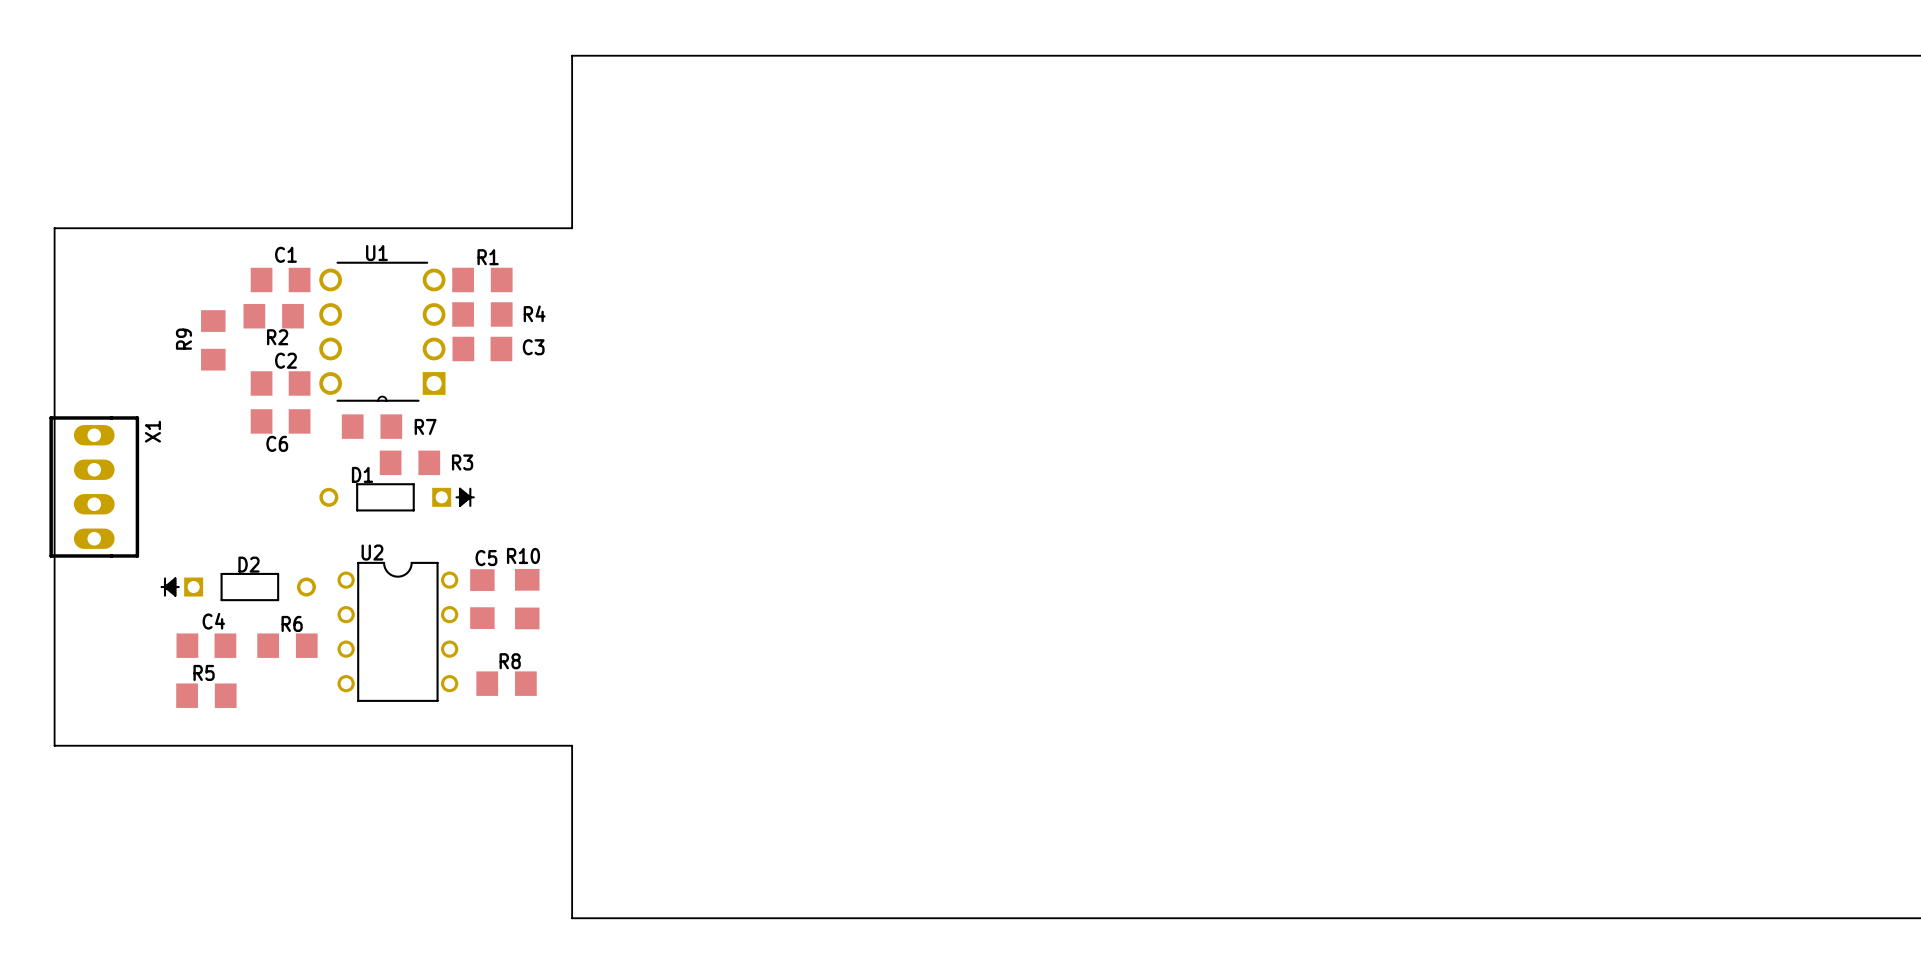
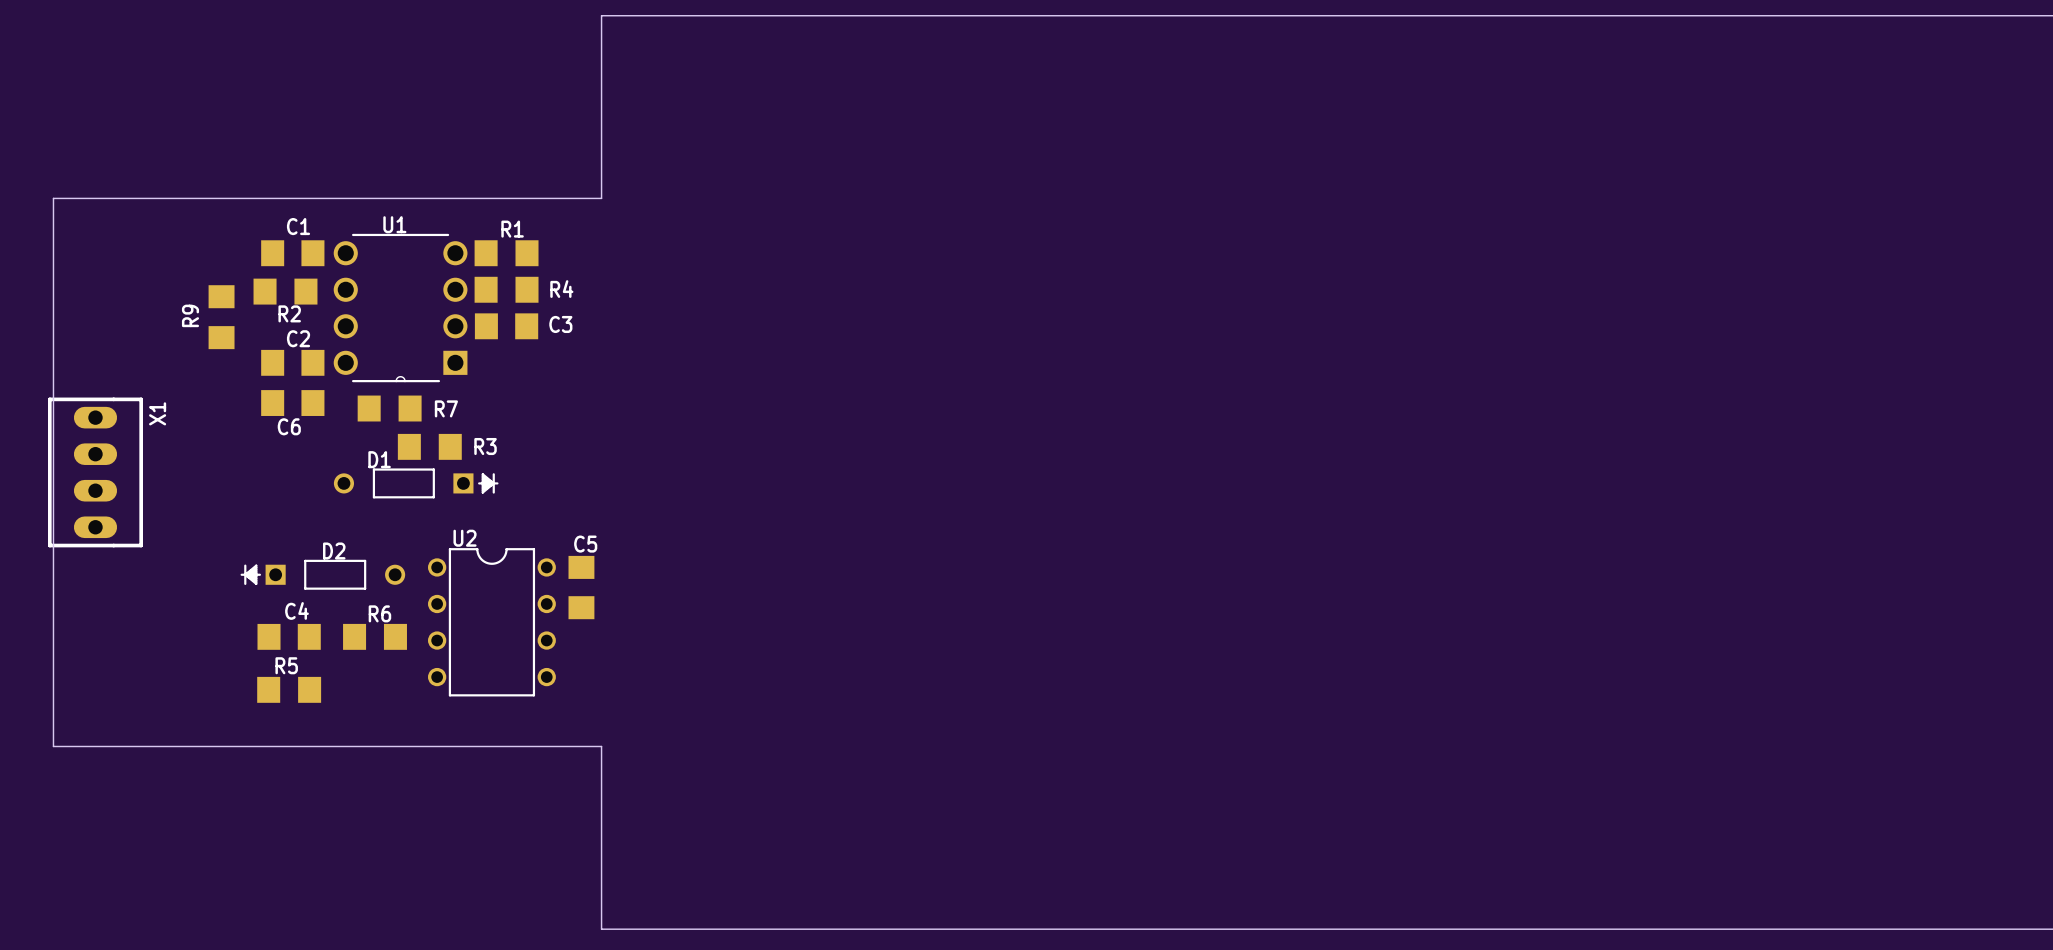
D2 position: (238, 587) -> (322, 574)
C5 position: (482, 599) -> (581, 587)
R10: (527, 599) -> none
U2 position: (397, 631) -> (491, 622)
C4 position: (206, 645) -> (289, 636)
R6 position: (287, 645) -> (375, 636)
R8: (506, 683) -> none
R5 position: (206, 695) -> (289, 689)

